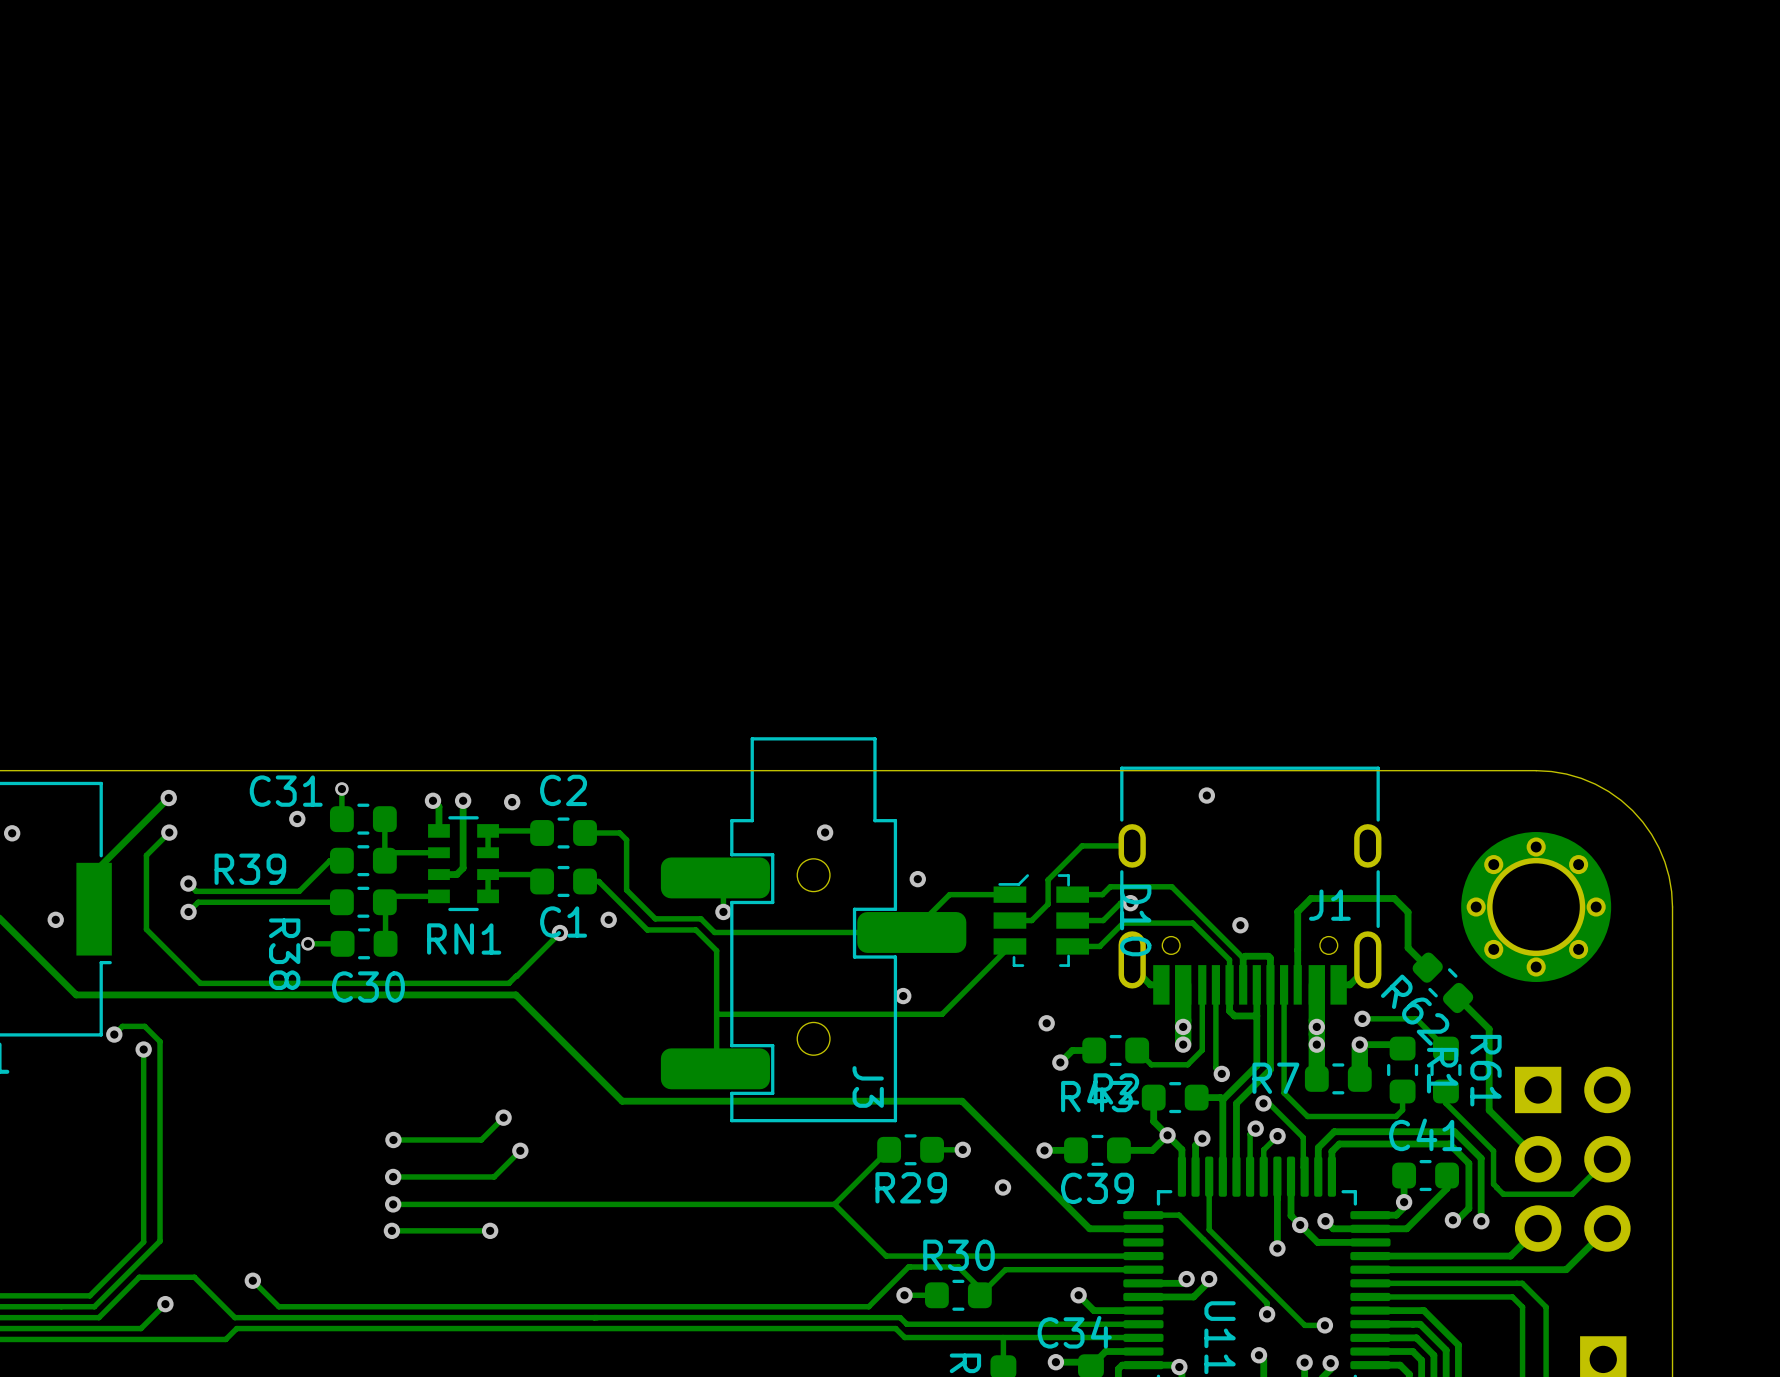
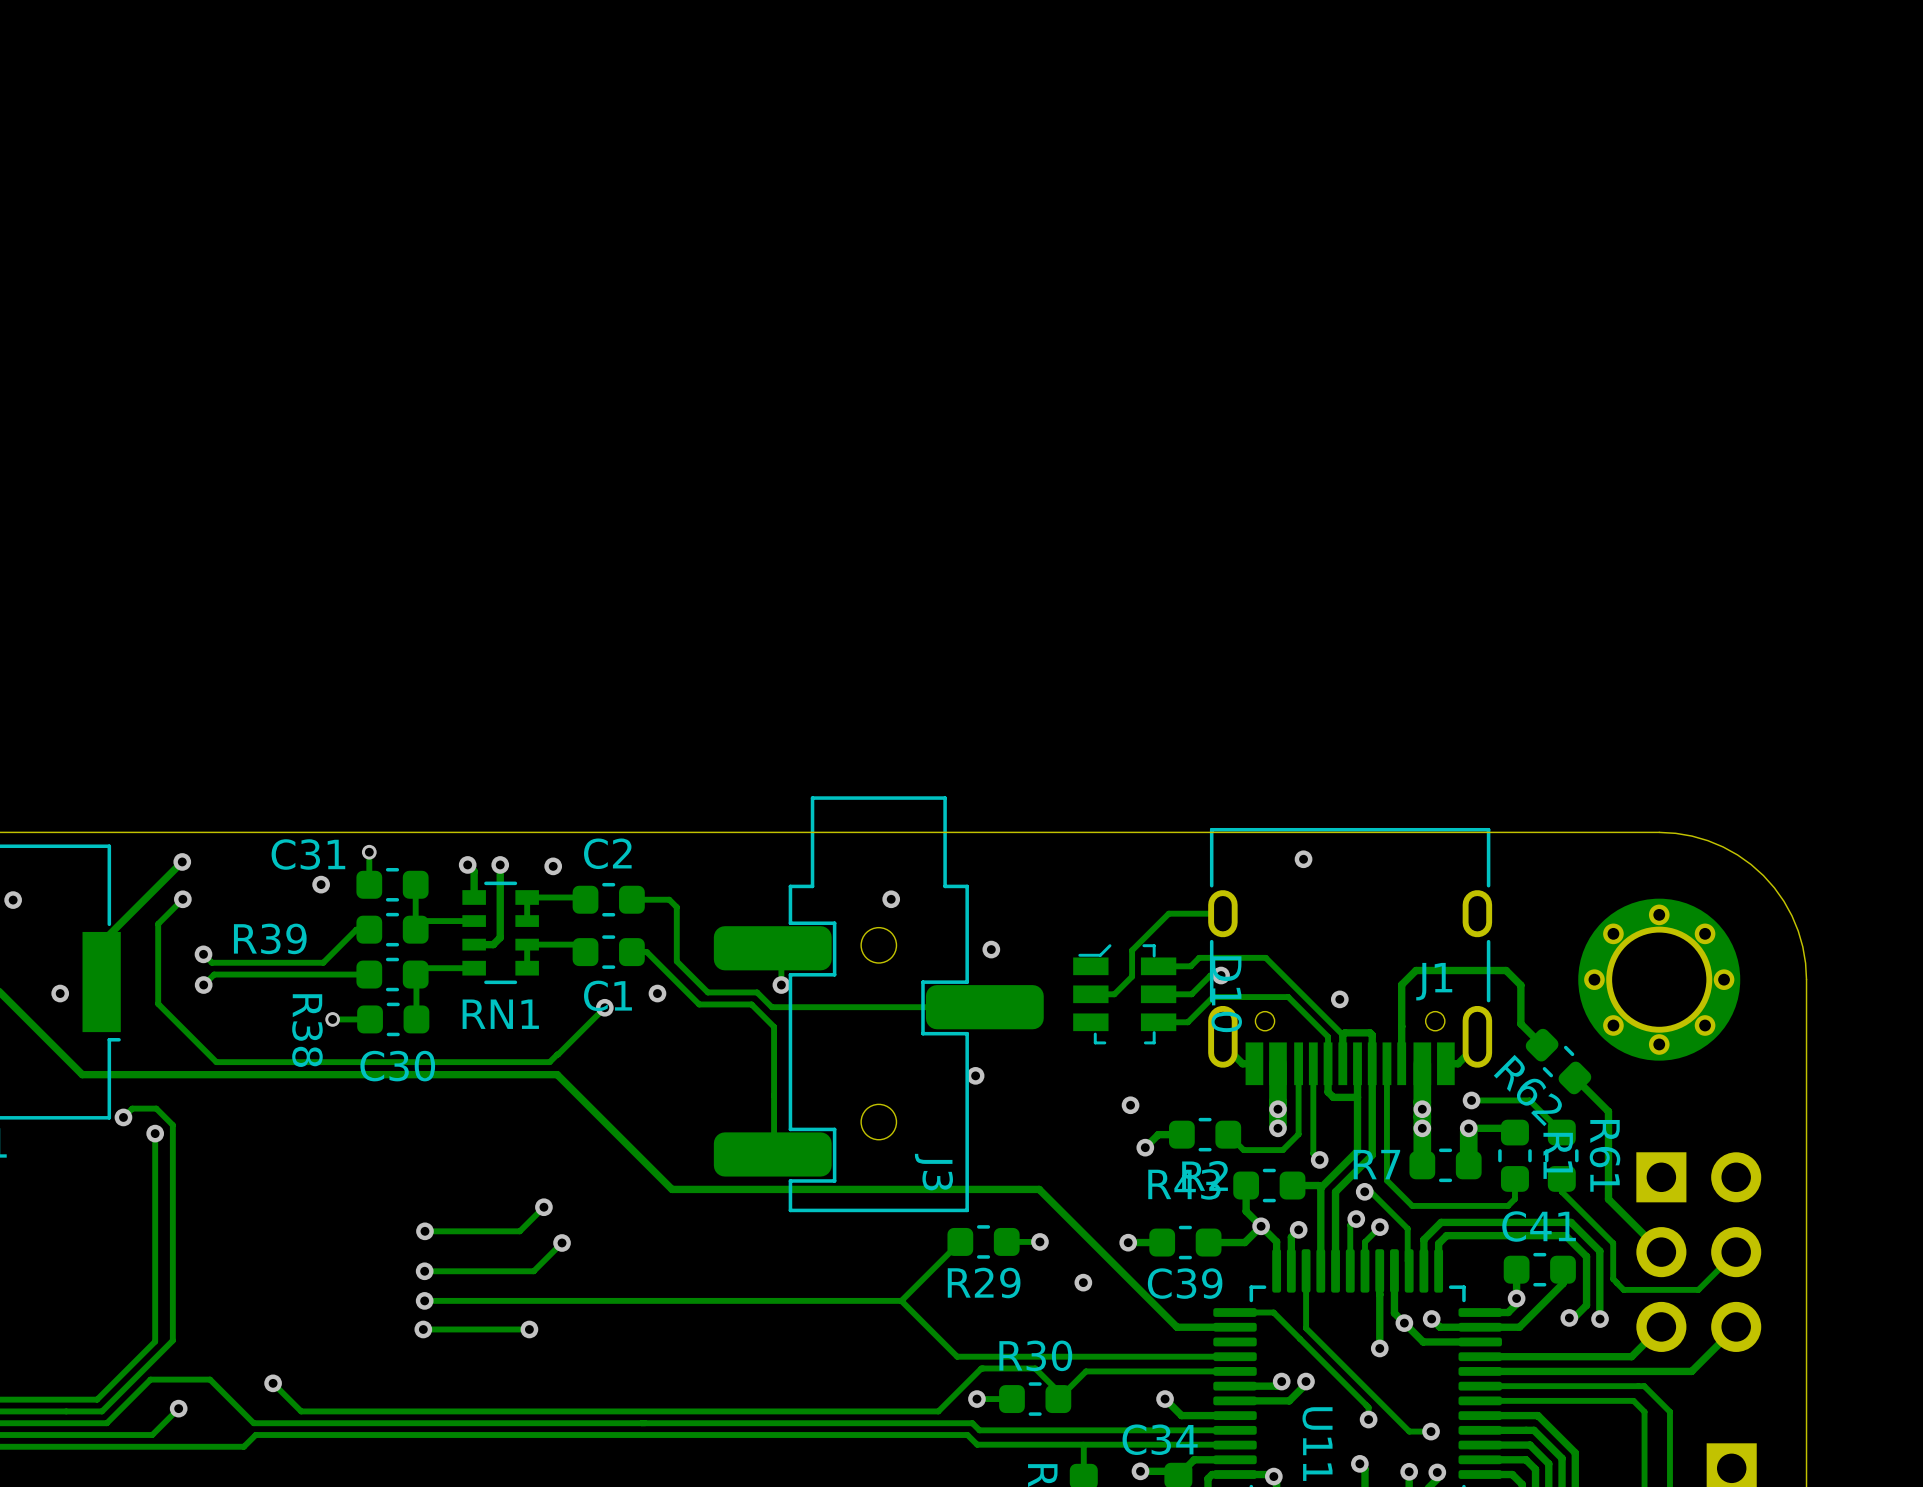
track: (1009, 894) (949, 894) (911, 932) -> none
track: (1009, 946) (942, 1014) (716, 1014) -> none

